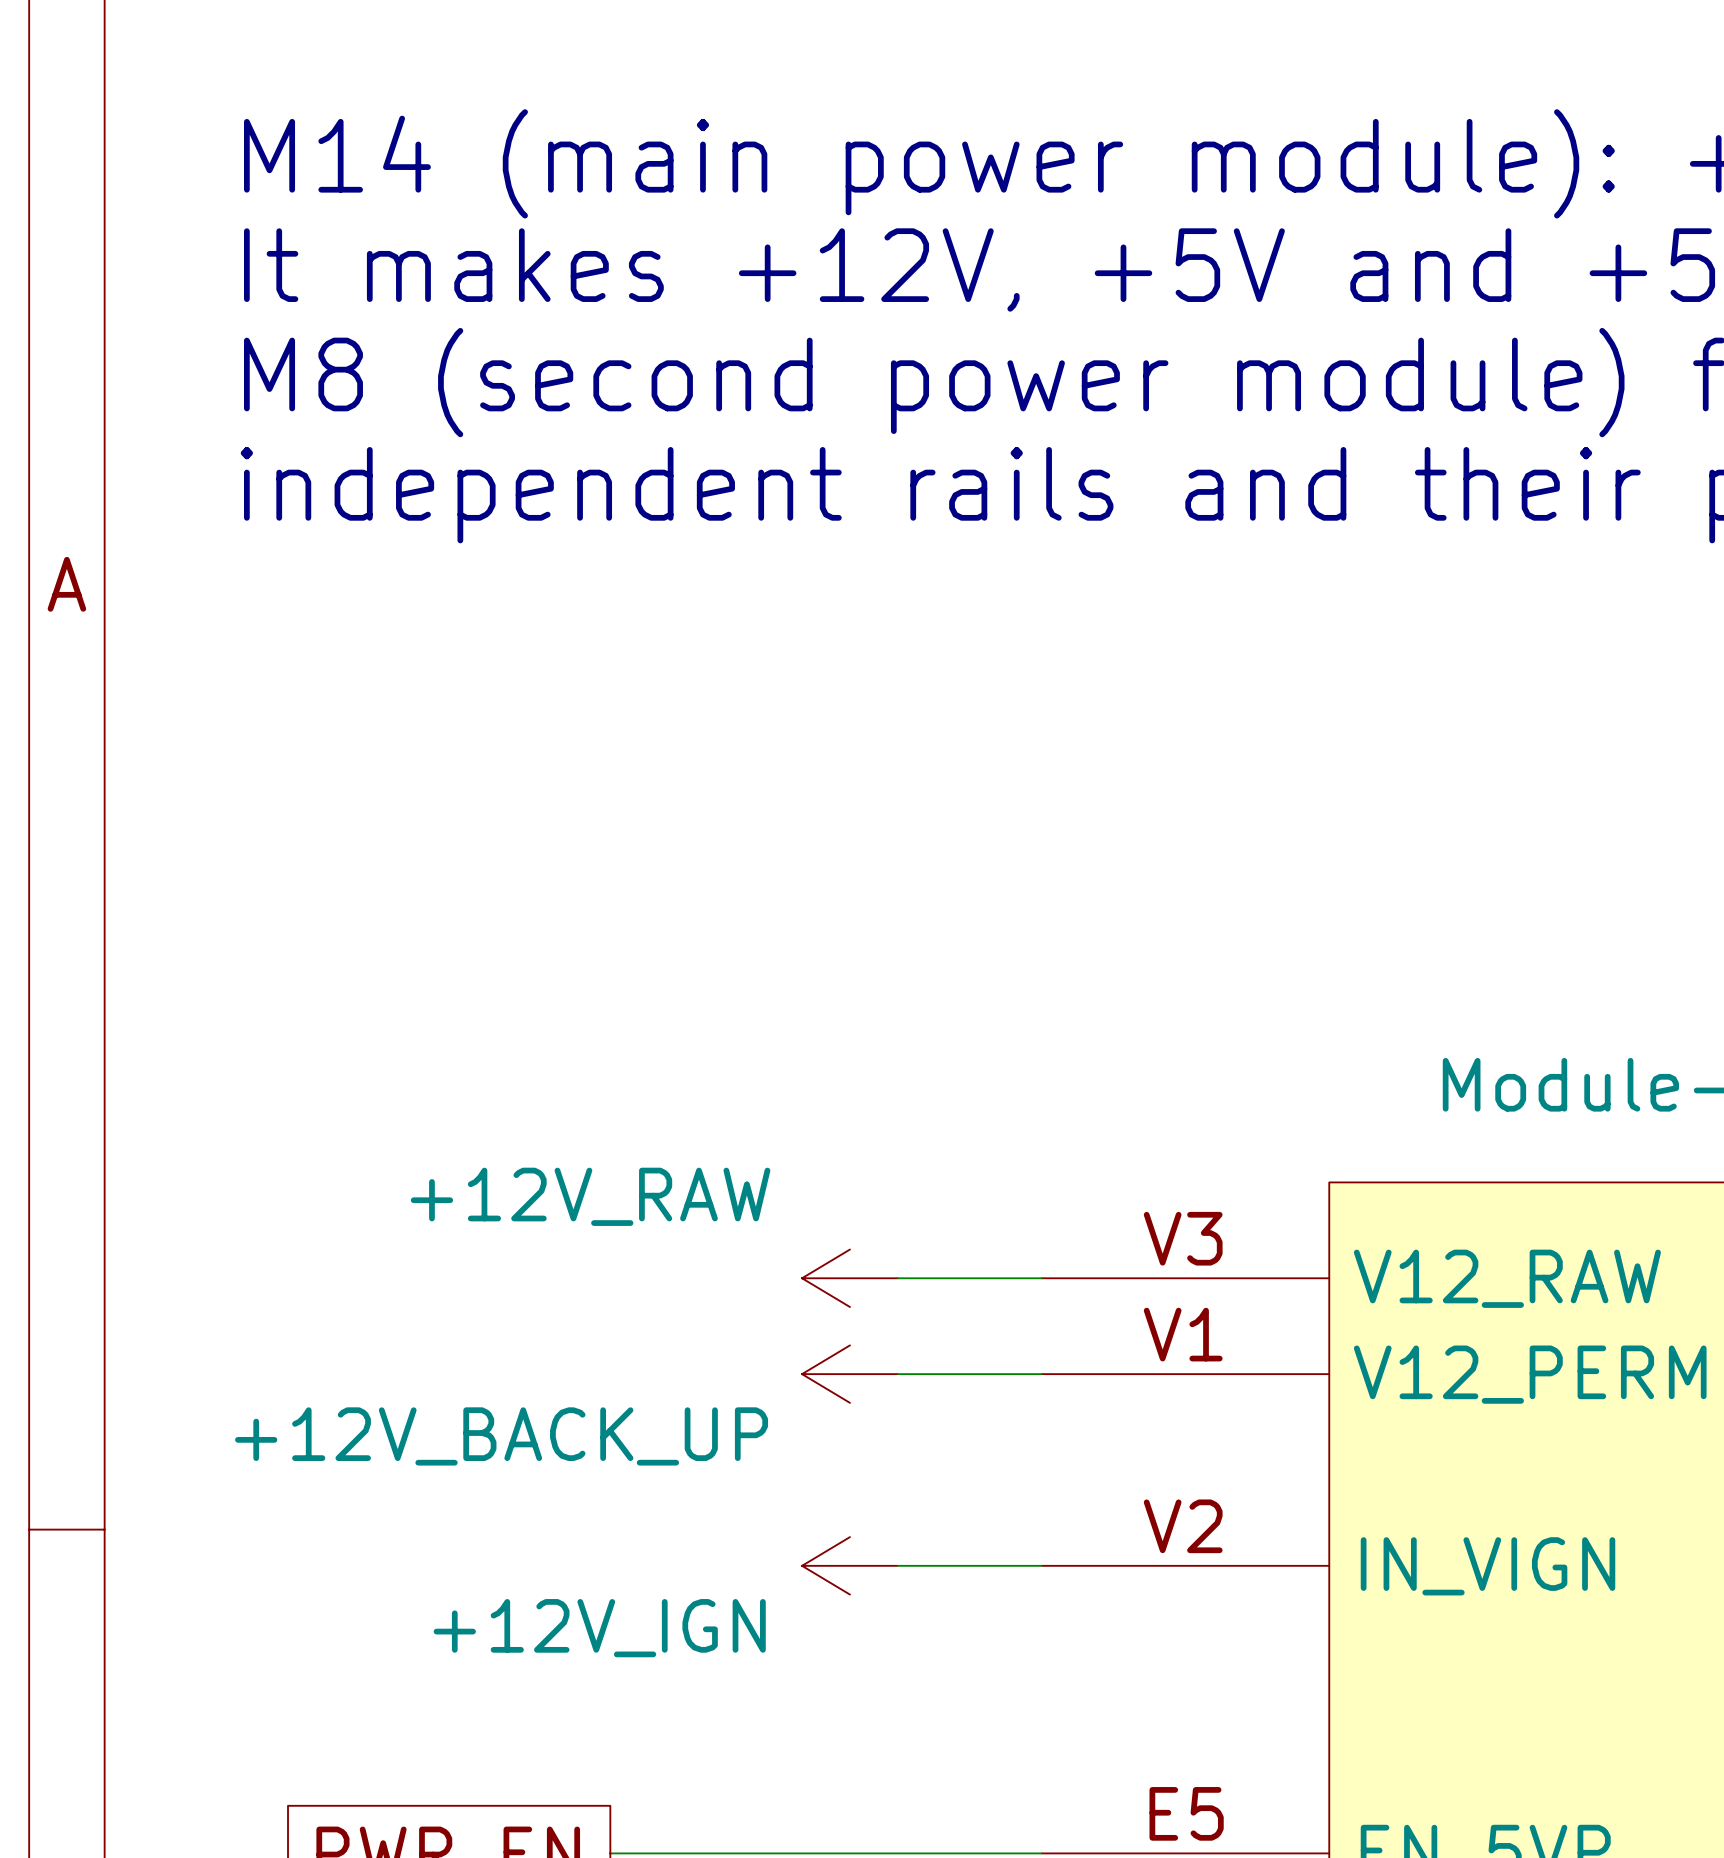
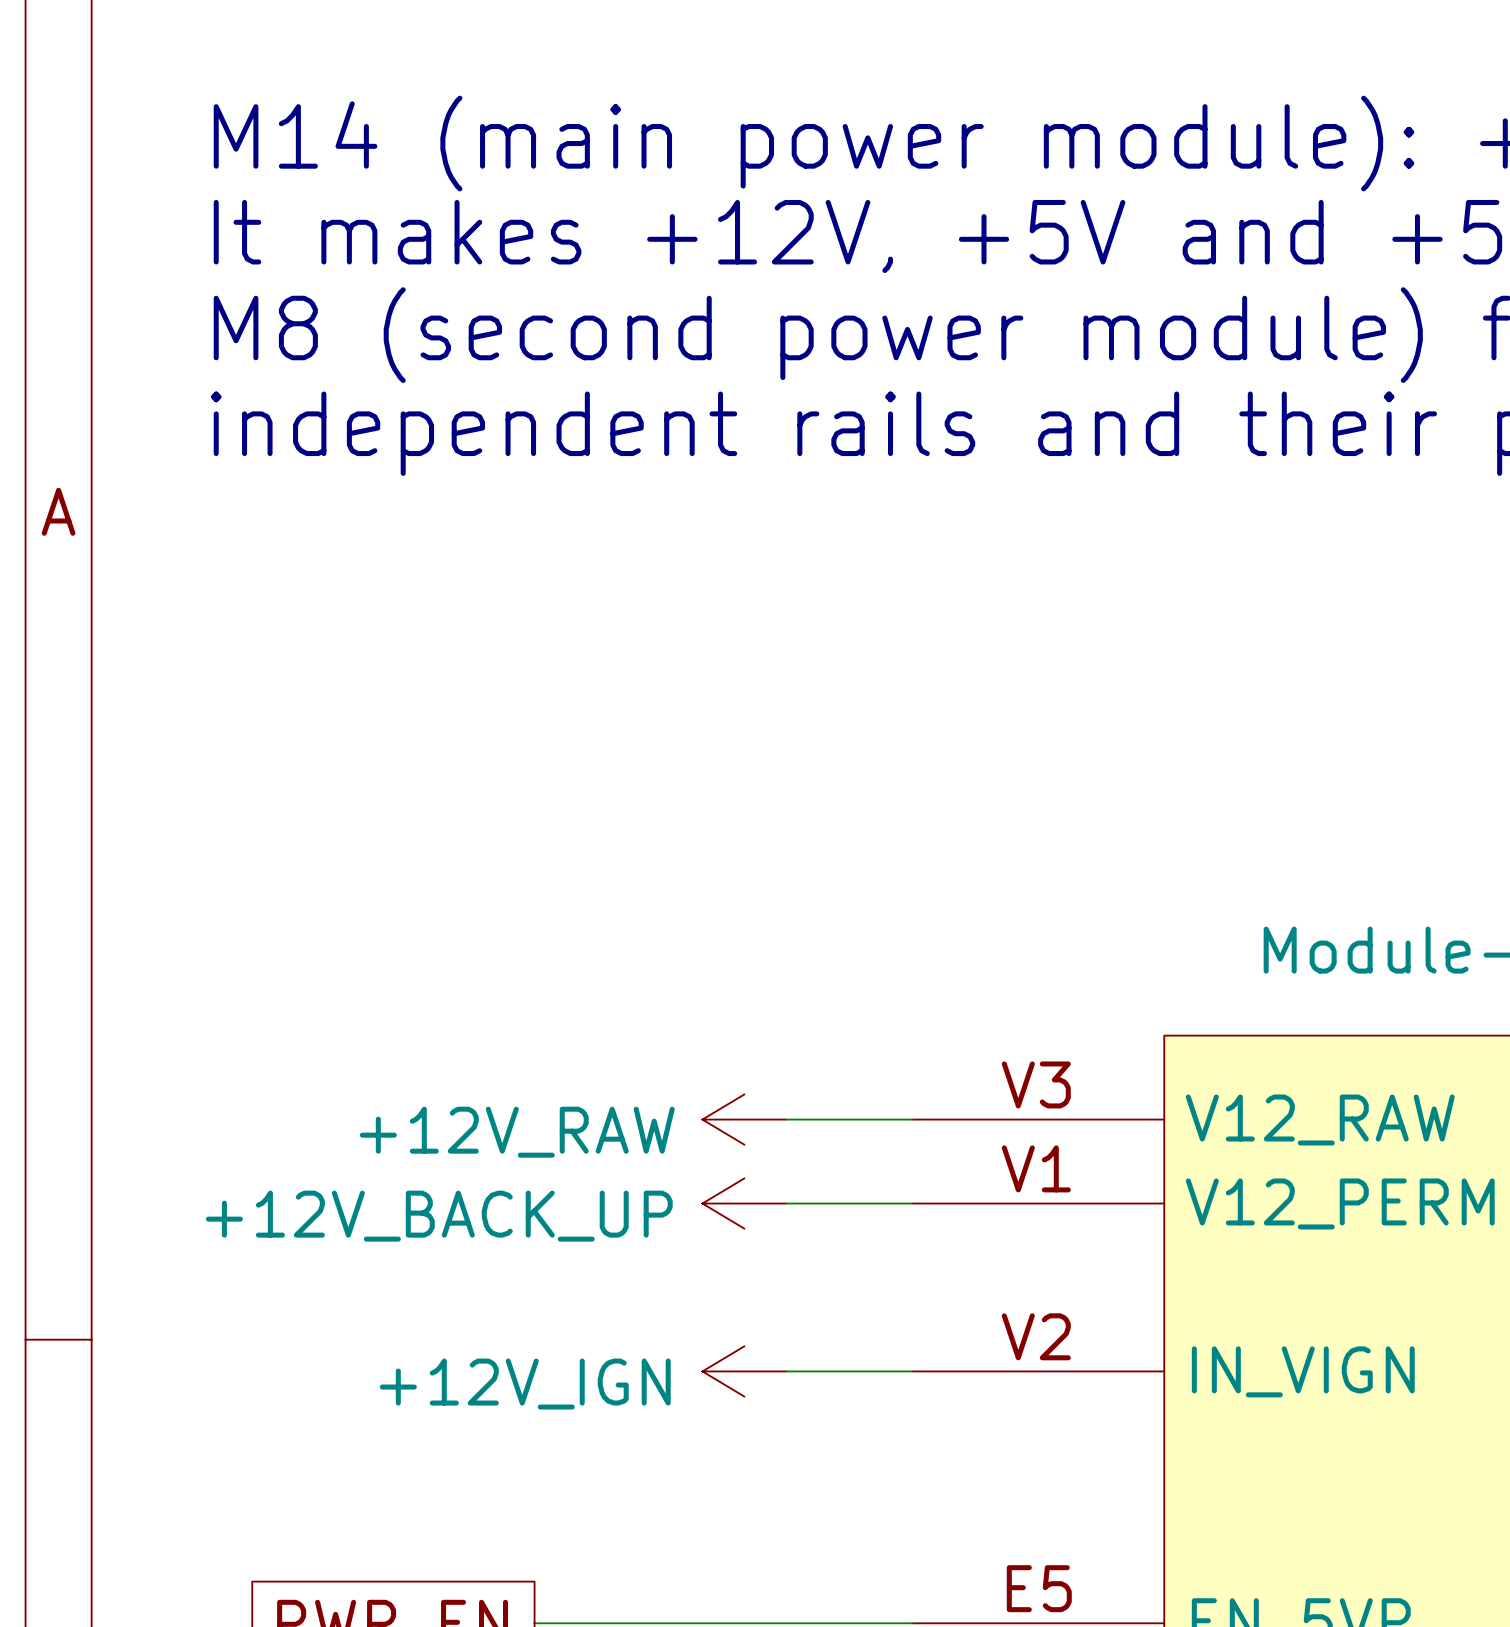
power symbol text position: +12V_RAW (590, 1196) -> +12V_RAW (517, 1132)
power symbol text position: +12V_BACK_UP (501, 1436) -> +12V_BACK_UP (439, 1216)
power symbol text position: +12V_IGN (599, 1628) -> +12V_IGN (525, 1384)

